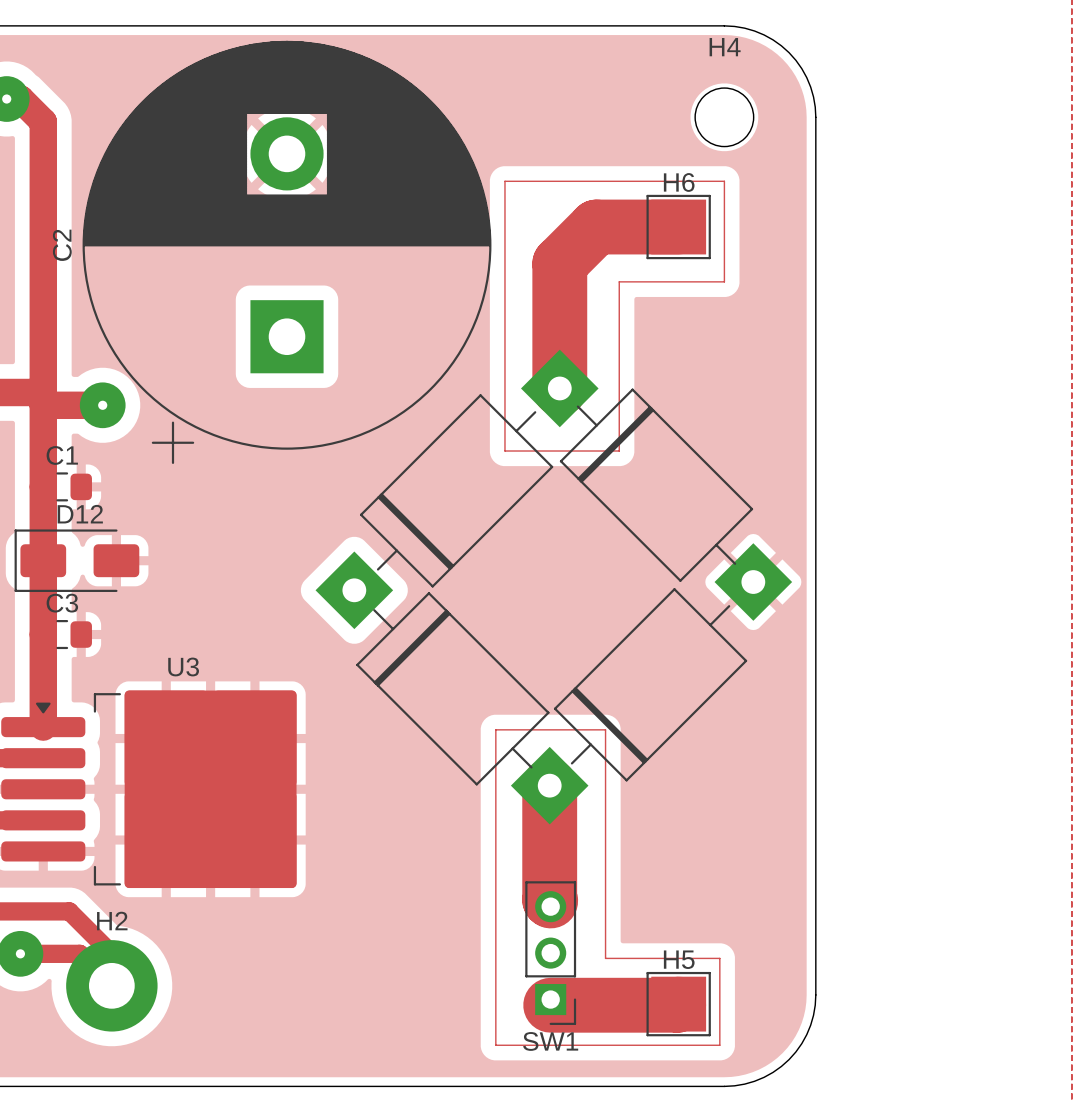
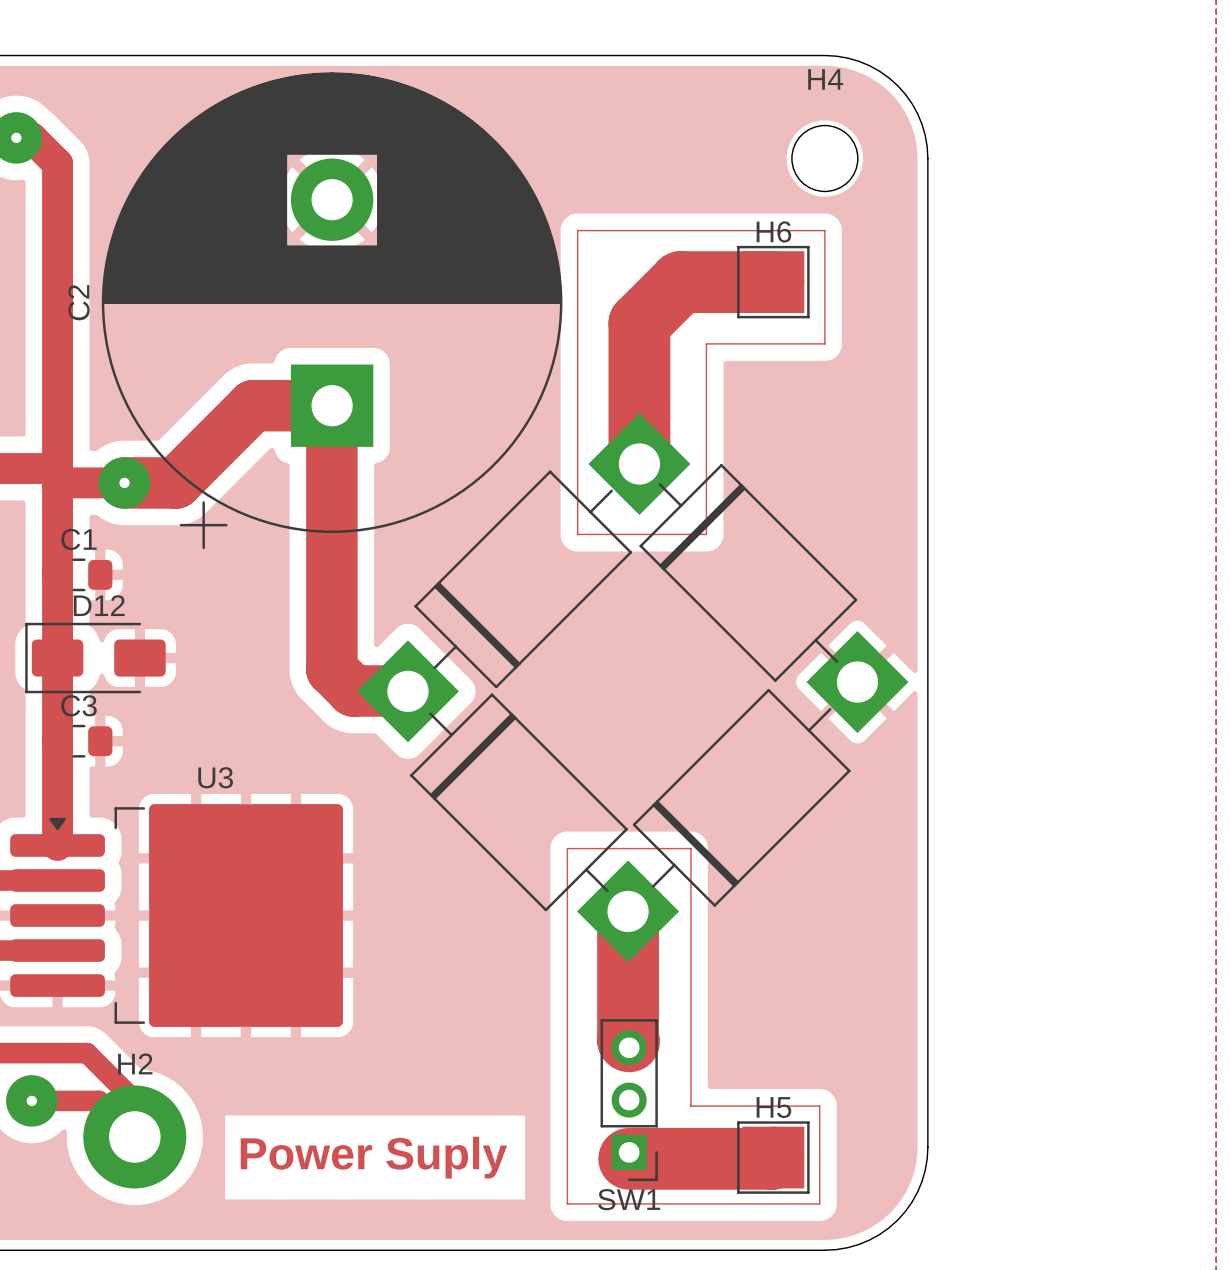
track: none -> (331, 405) (331, 669) (353, 690) (407, 690)
track: none -> (332, 405) (253, 405) (176, 482) (124, 482)
part footprint: [315, 349, 793, 825] -> [357, 413, 909, 963]
text: none -> Power Suply (373, 1157)

